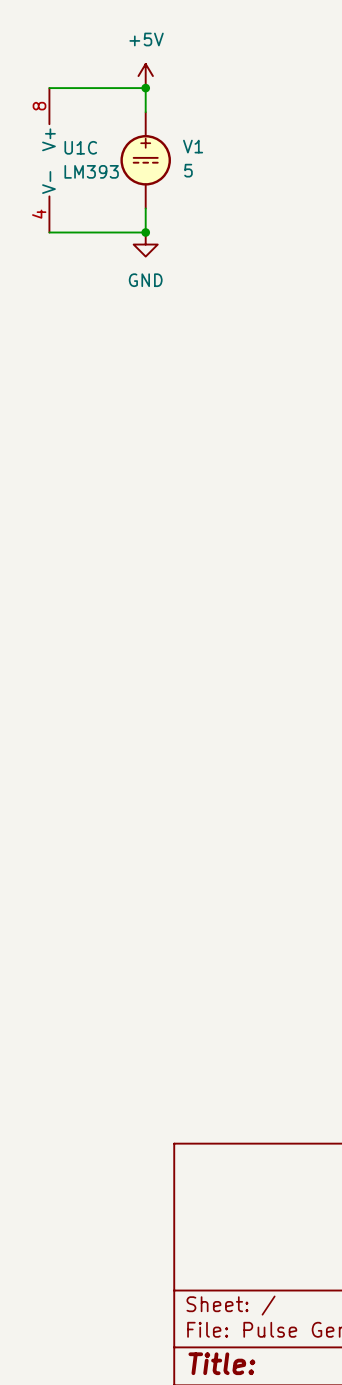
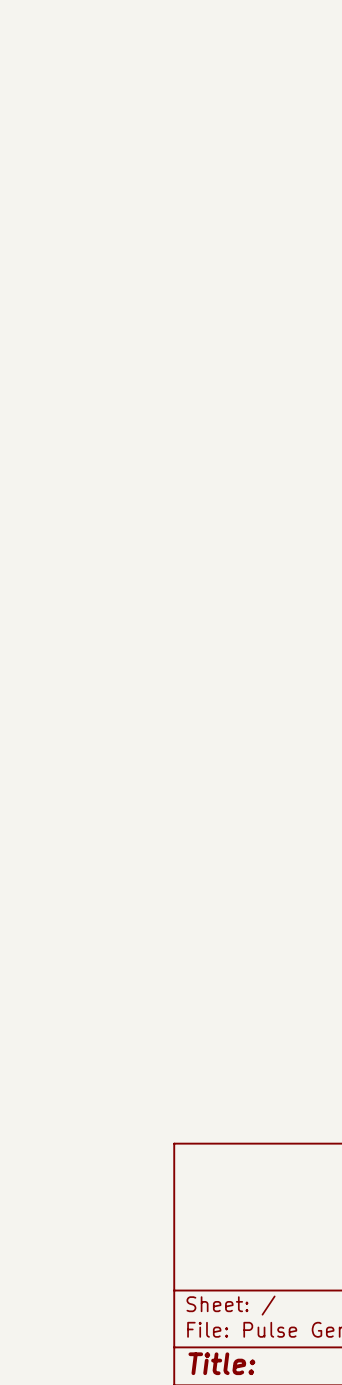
power symbol: +5V (145, 76) -> none
wire: (49, 88) (145, 88) (145, 112) -> none
junction: (145, 88) -> none
U1C: LM393 (49, 160) -> none
V1: 5 (145, 160) -> none
wire: (145, 208) (145, 232) (49, 232) -> none
junction: (145, 232) -> none
power symbol: GND (145, 244) -> none

